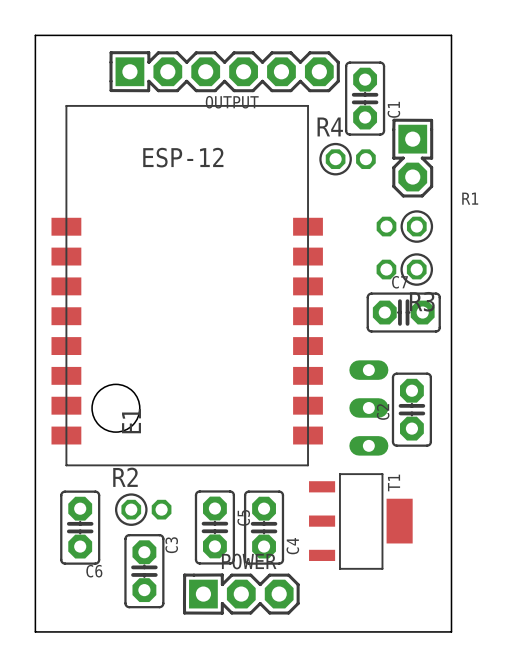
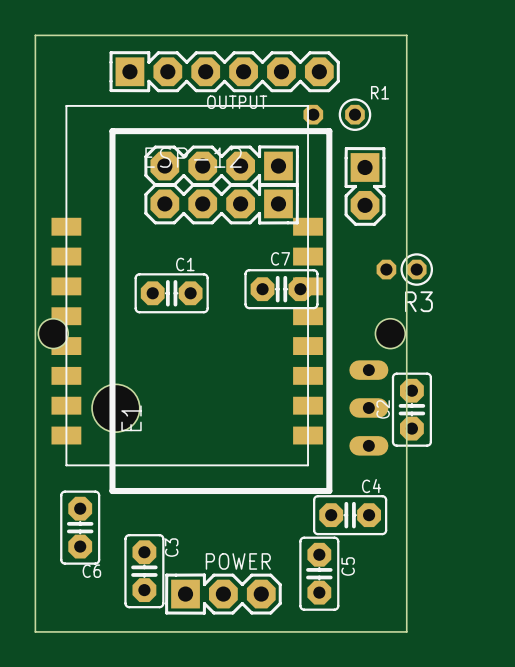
board edge: (406, 35) (451, 35) (451, 631) (406, 631) -> (406, 35) (406, 631)
C1 rotation: 0° (365, 98) -> 90° clockwise (171, 293)
C1 position: (365, 98) -> (171, 293)
C1 name position: C1 (393, 109) -> C1 (185, 264)
line: none -> (112, 131) (329, 131) (329, 491) (112, 491) (112, 131)
part position: (412, 158) -> (365, 186)
R4: (347, 159) -> none
part: none -> (221, 166)
part: none -> (221, 203)
R1 footprint: [376, 210, 434, 243] -> [303, 98, 372, 131]
C7 position: (403, 312) -> (281, 289)
hole: none -> (53, 333)
hole: none -> (390, 333)
R2: (143, 509) -> none
T1: (360, 521) -> none
C5 position: (214, 527) -> (319, 573)
C4 rotation: 0° (264, 527) -> 90° clockwise (350, 515)
C4 position: (264, 527) -> (350, 515)
C4 name position: C4 (292, 546) -> C4 (371, 486)
POWER position: (241, 594) -> (223, 594)

